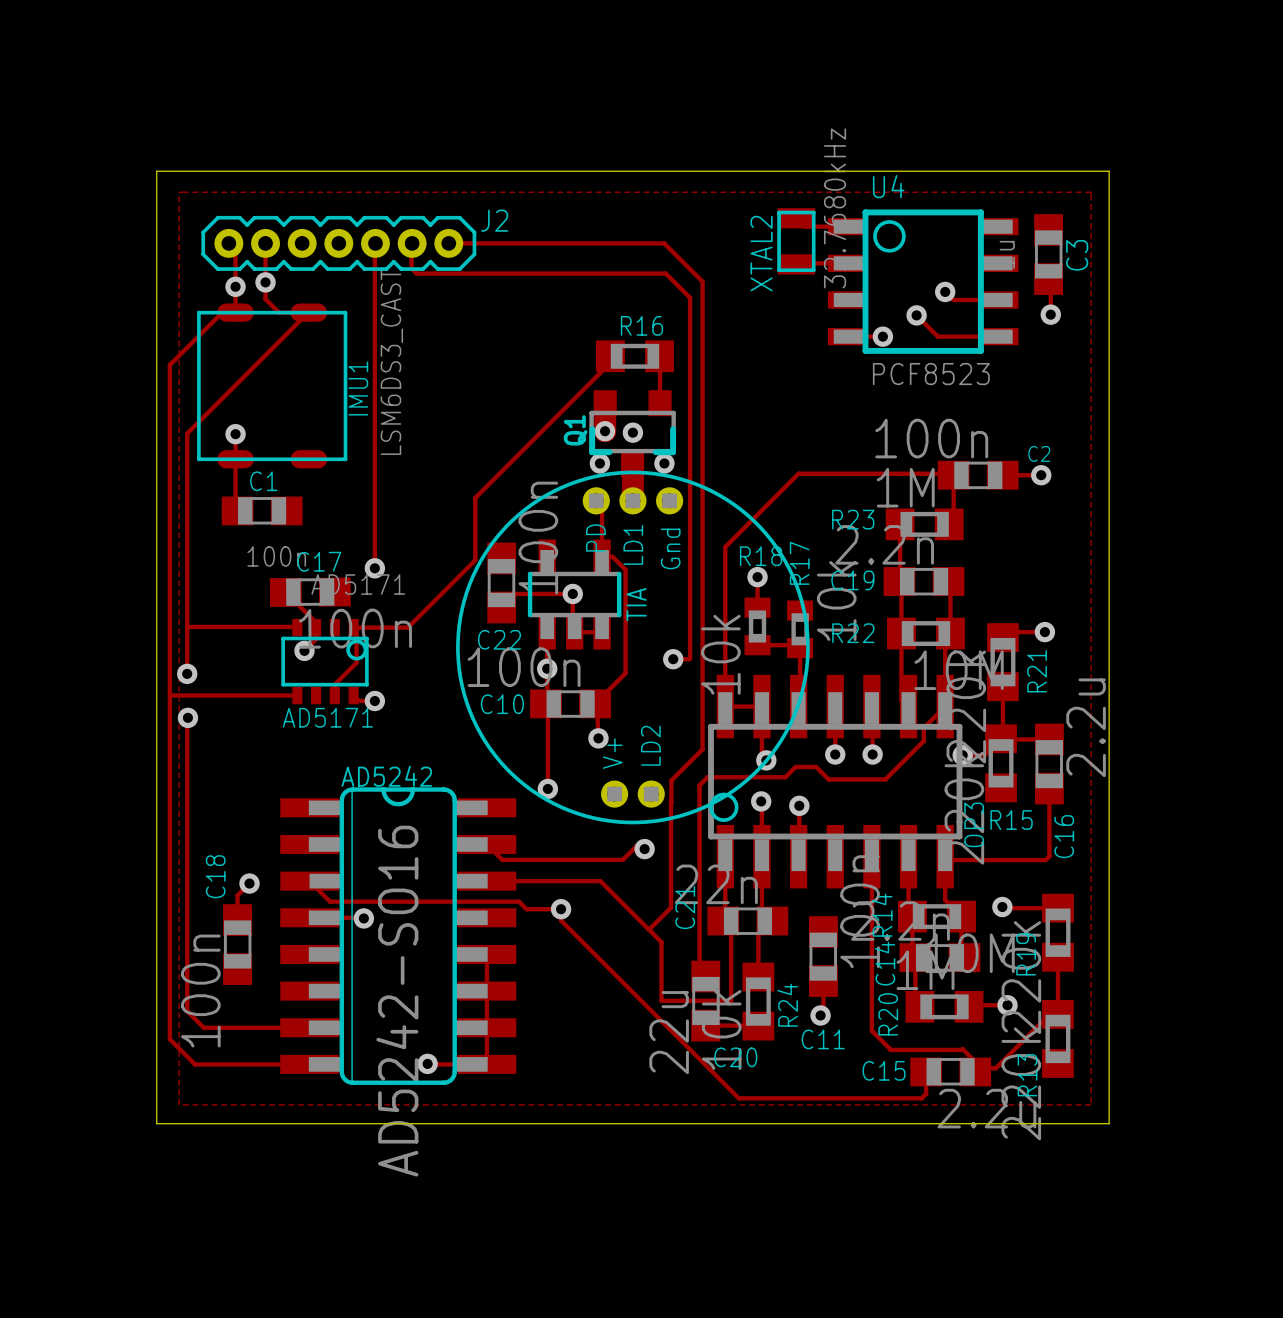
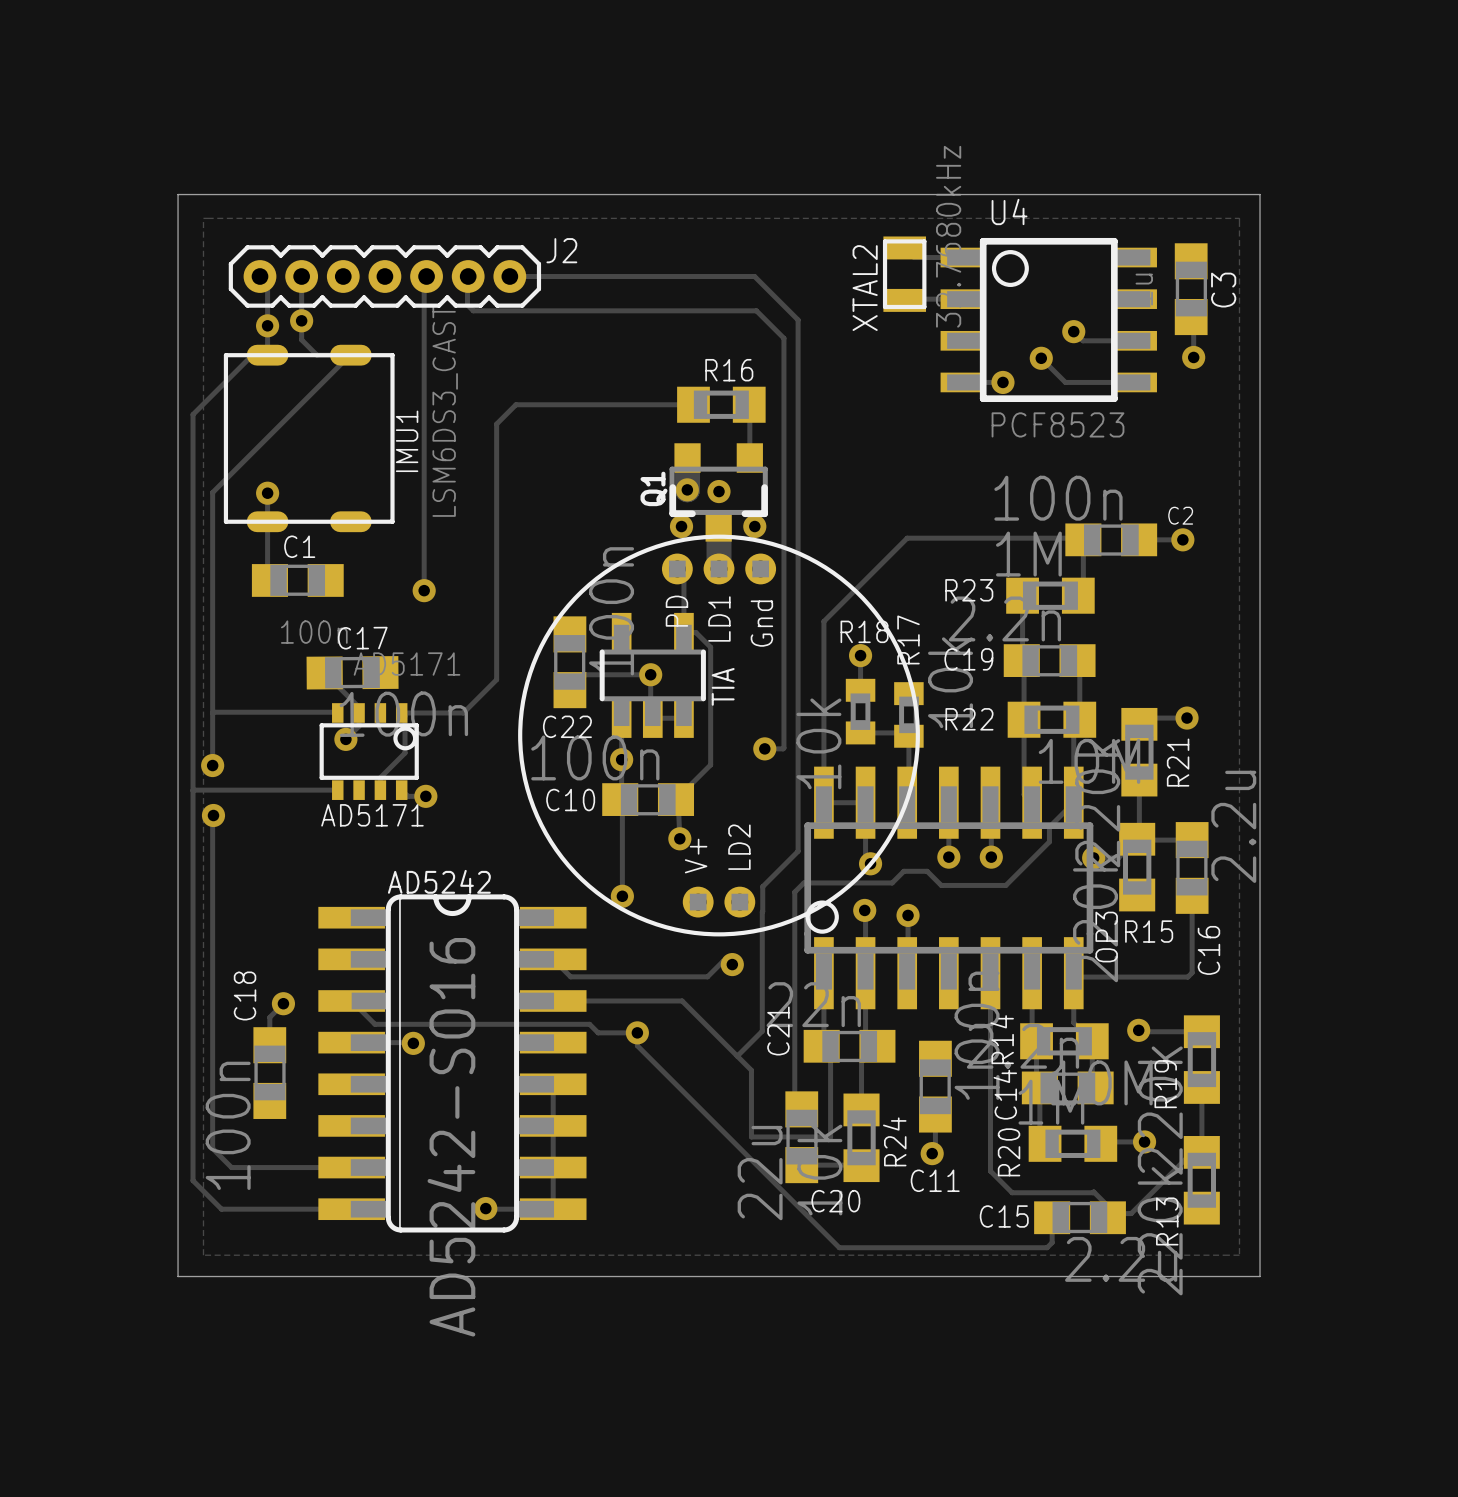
track: (374, 244) (374, 568) -> (425, 277) (424, 278) (424, 590)
track: (610, 356) (610, 362) (475, 497) (475, 560) (437, 598) -> (693, 404) (515, 404) (496, 424) (496, 679)
via position: (374, 568) -> (424, 590)

